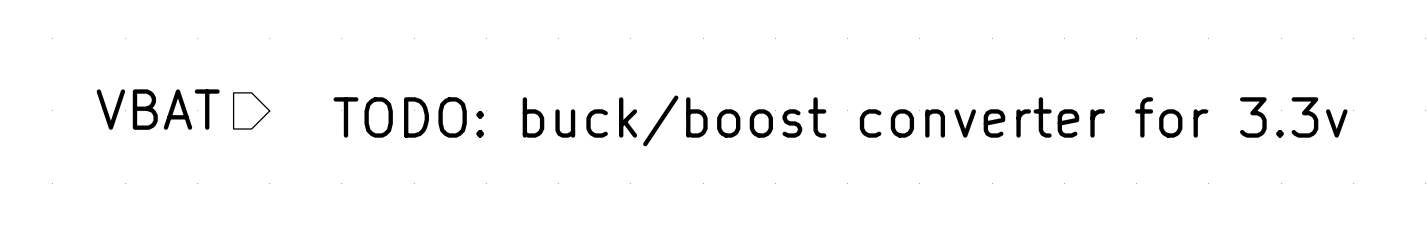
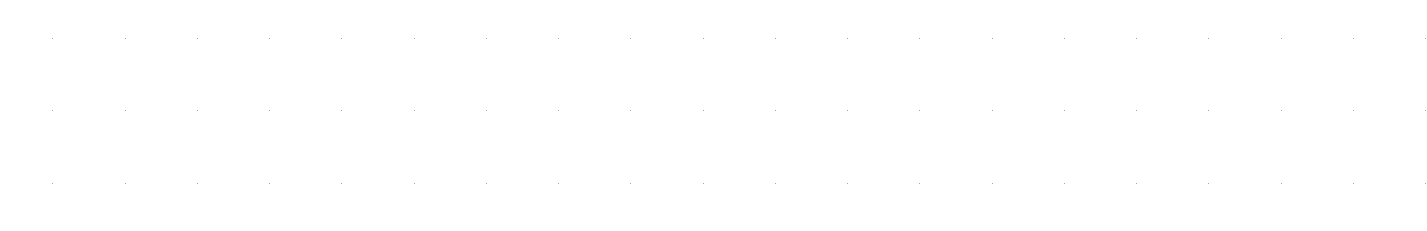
hierarchical label: VBAT (158, 109) -> none
text: TODO: buck/boost converter for 3.3v (840, 120) -> none

